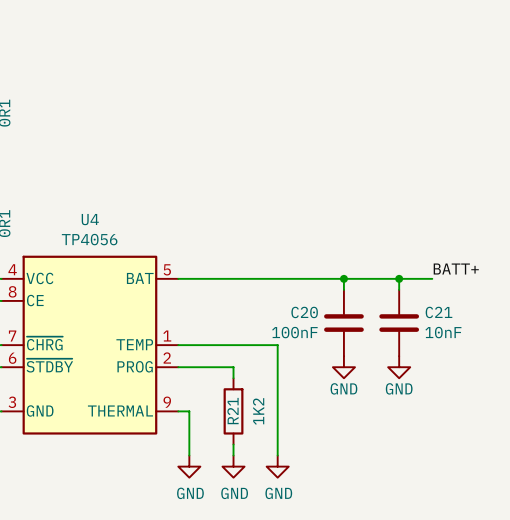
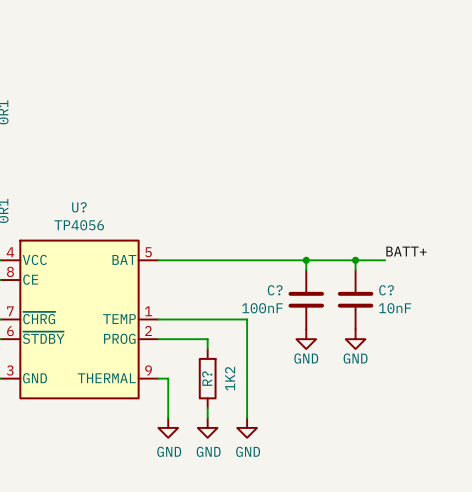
U4 name: U4 (90, 219) -> U? (79, 207)
C20 name: C20 (304, 312) -> C? (275, 290)
C21 name: C21 (439, 312) -> C? (386, 290)
R21 name: R21 (233, 411) -> R? (207, 378)

